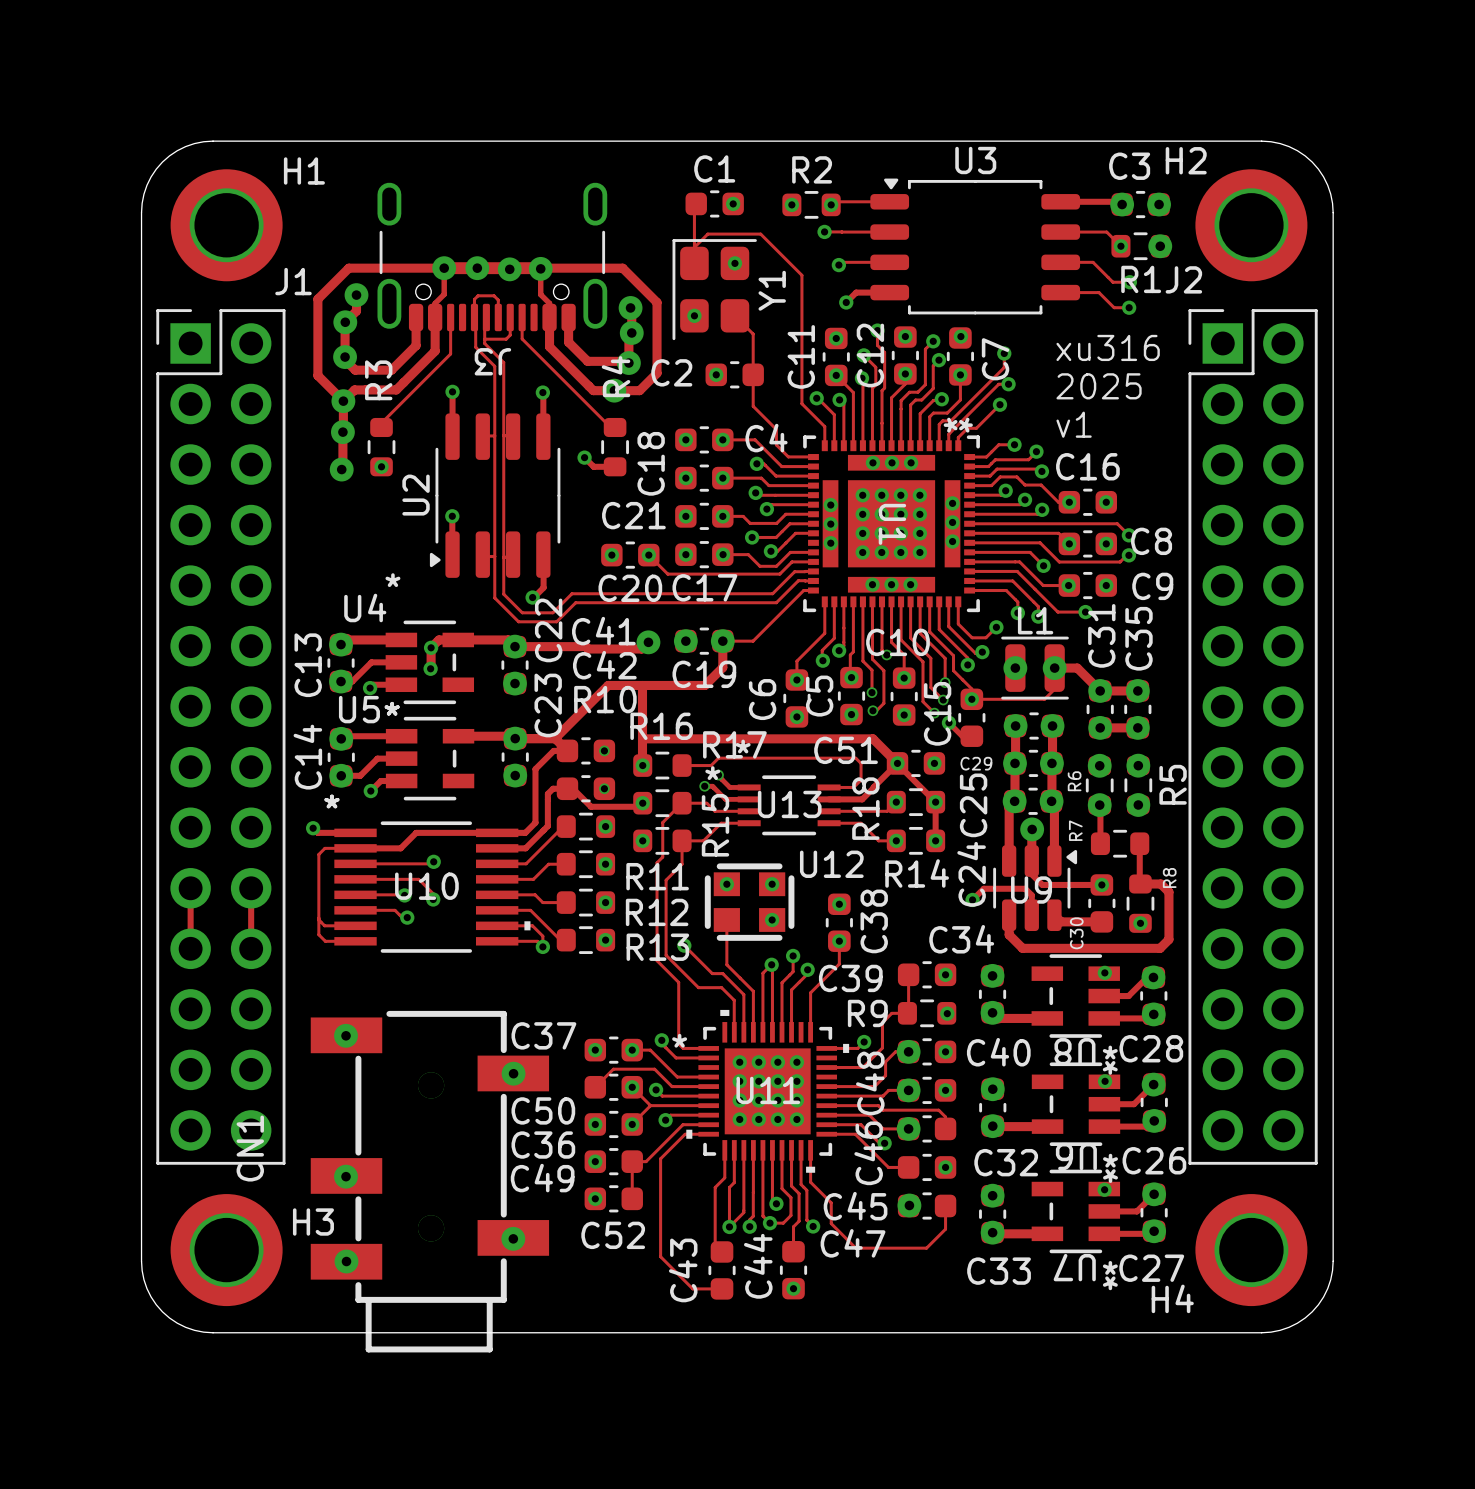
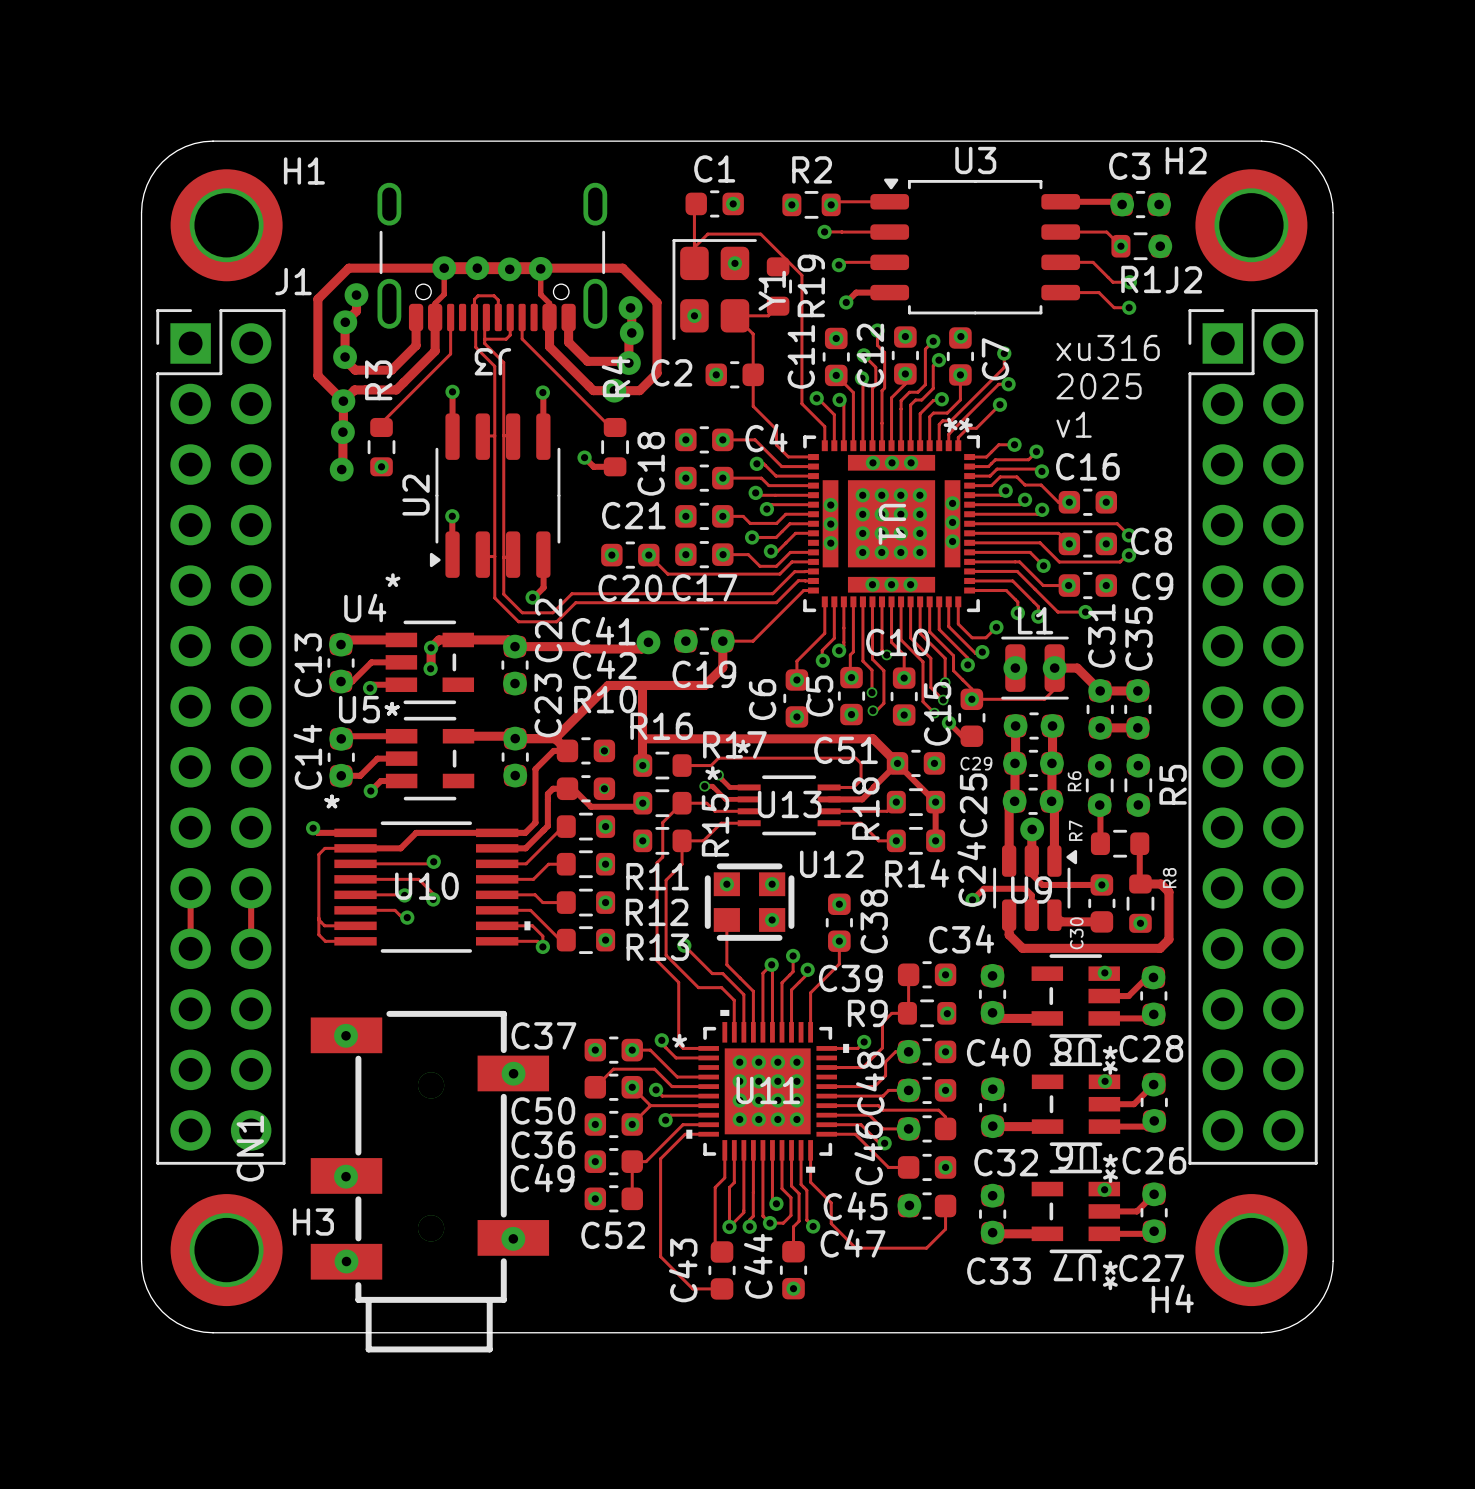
R19: none -> (778, 286)
track: none -> (778, 306) (768, 315) (734, 315)

